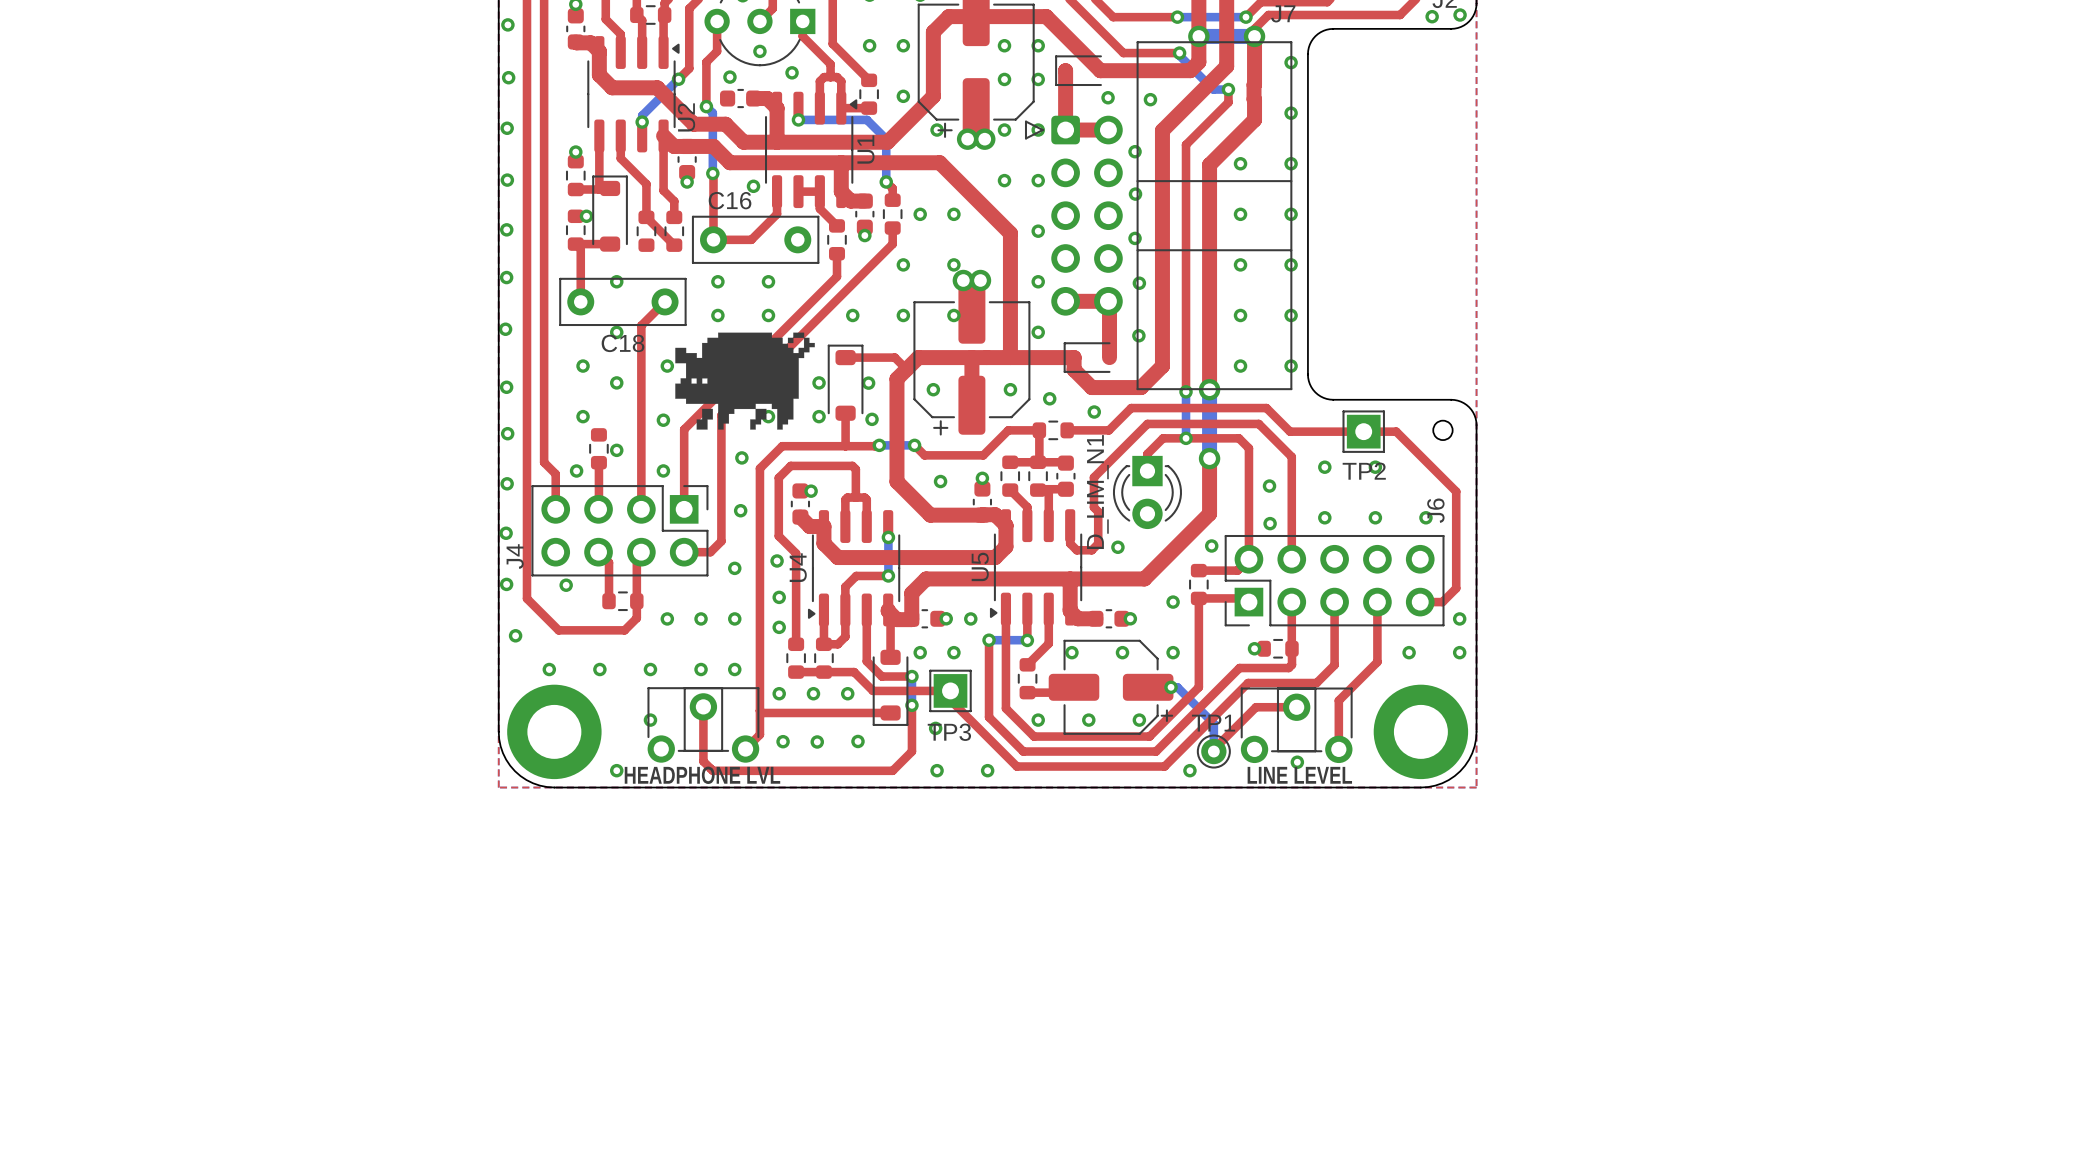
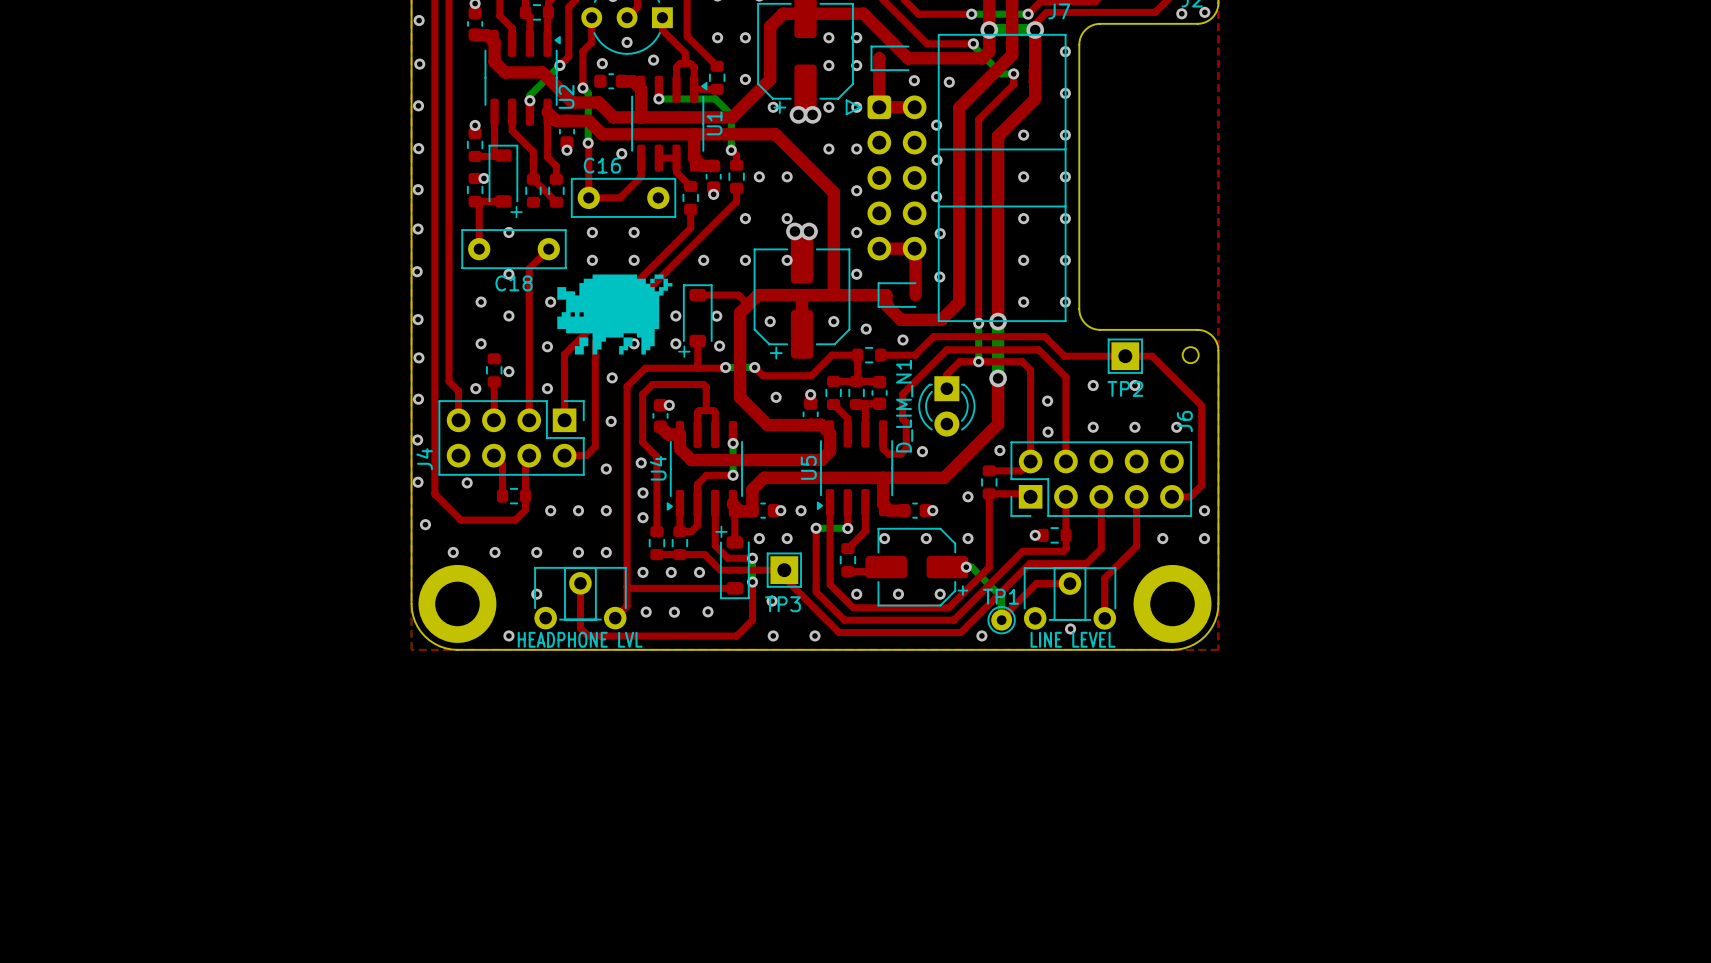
text: none -> + (516, 212)
text: none -> + (684, 351)
text: none -> + (721, 531)

